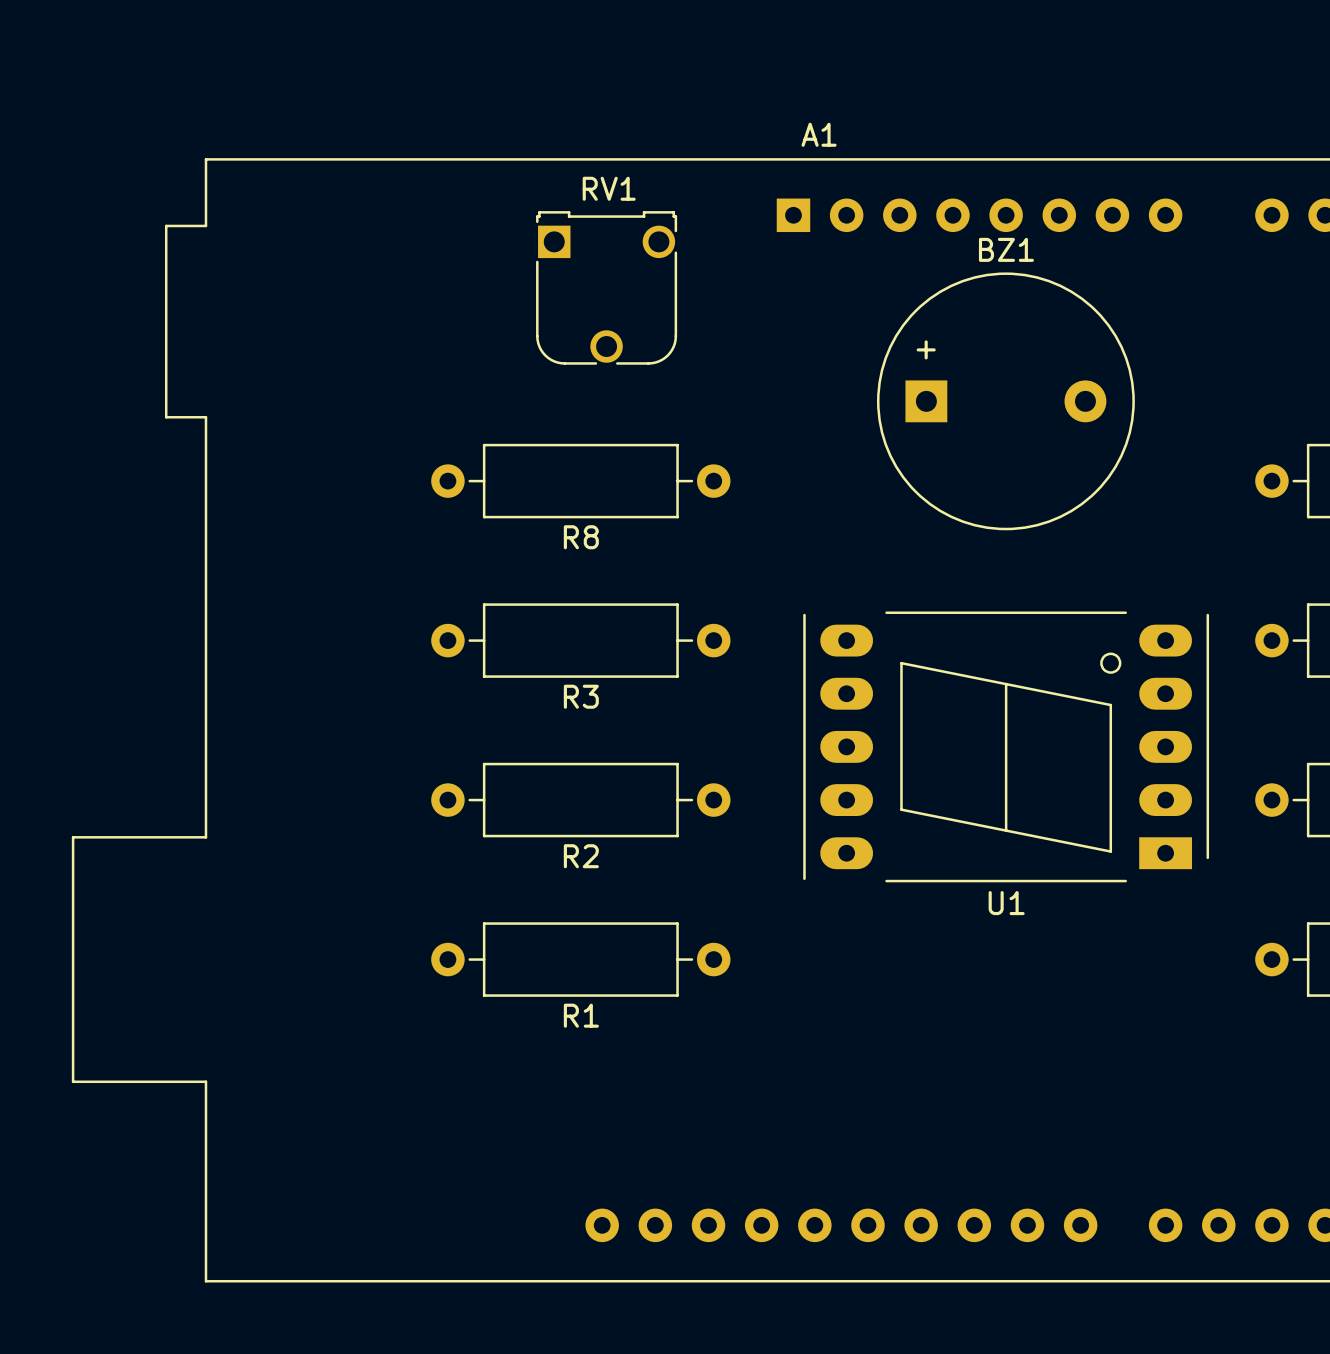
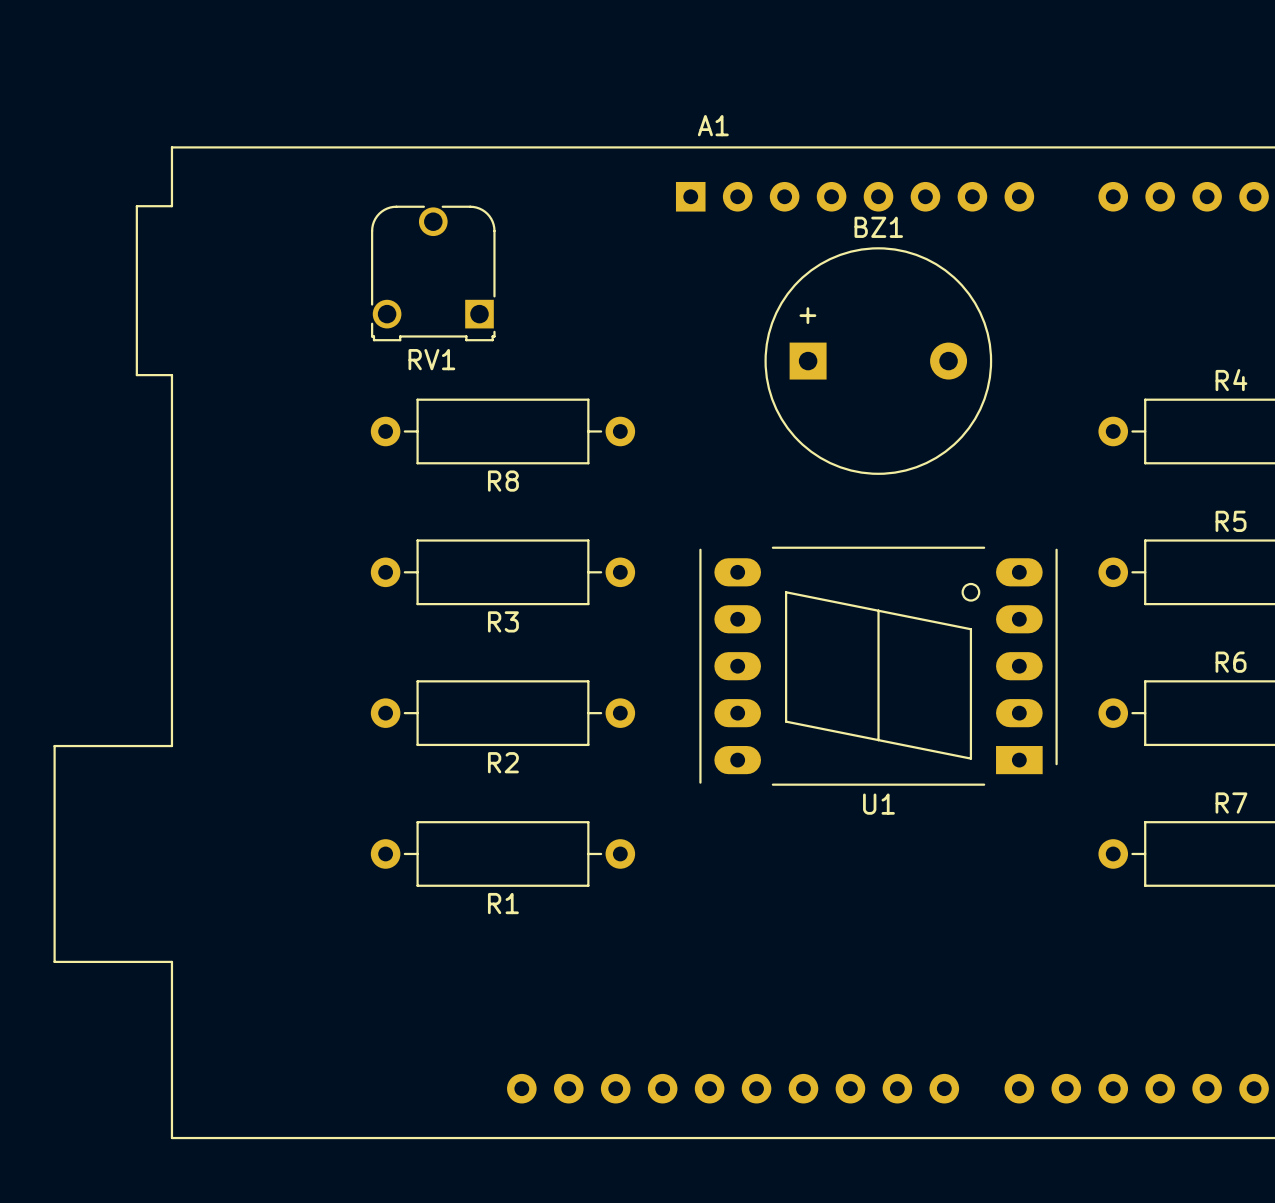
RV1 rotation: 0° (606, 287) -> 180° (433, 273)
RV1 position: (606, 287) -> (433, 273)

